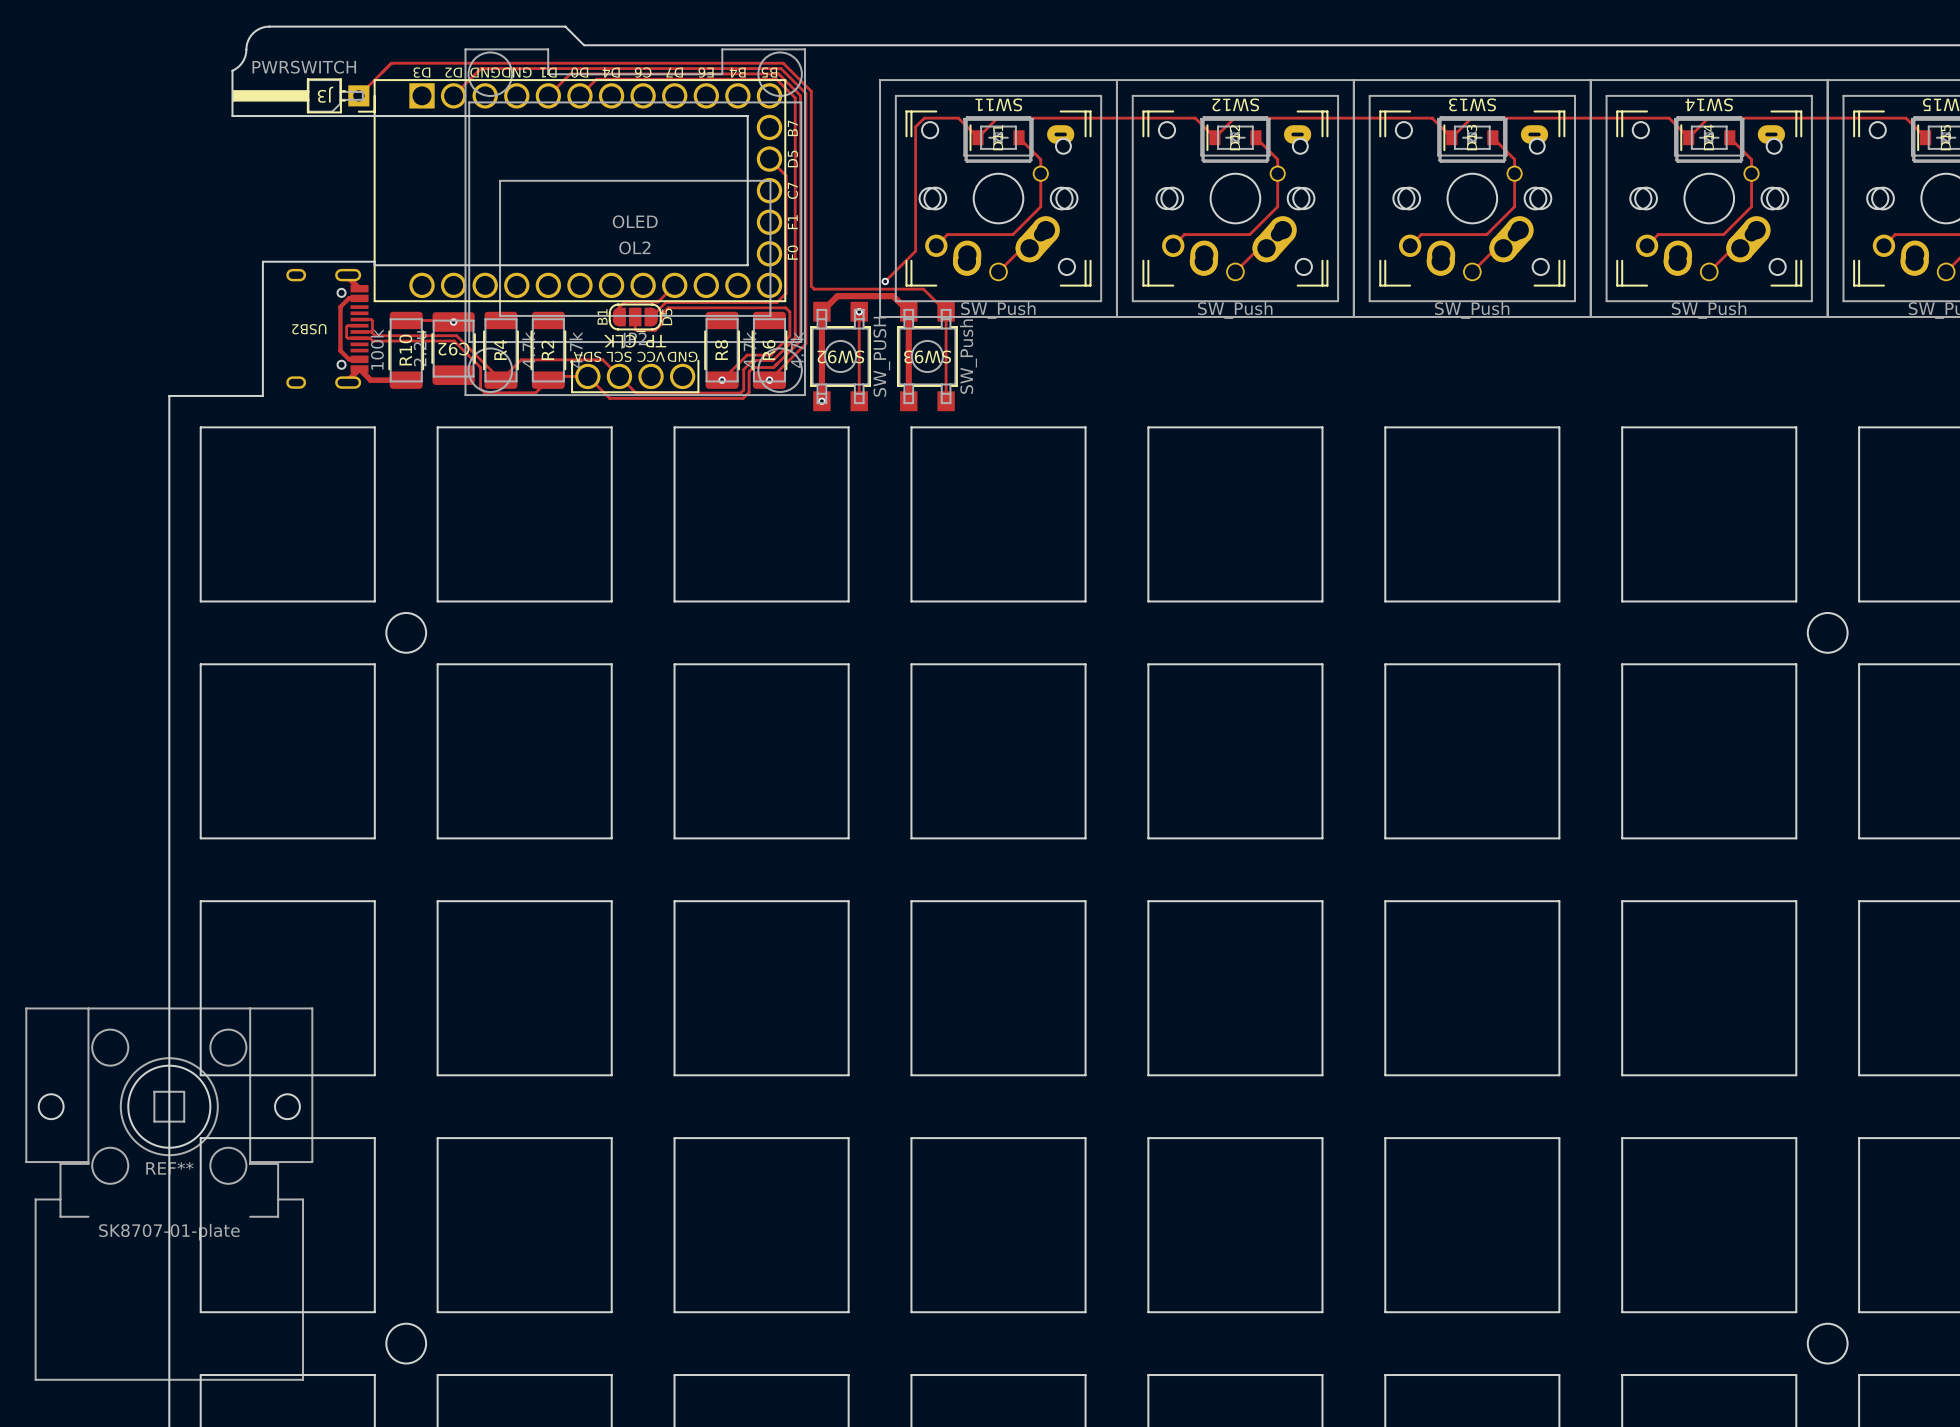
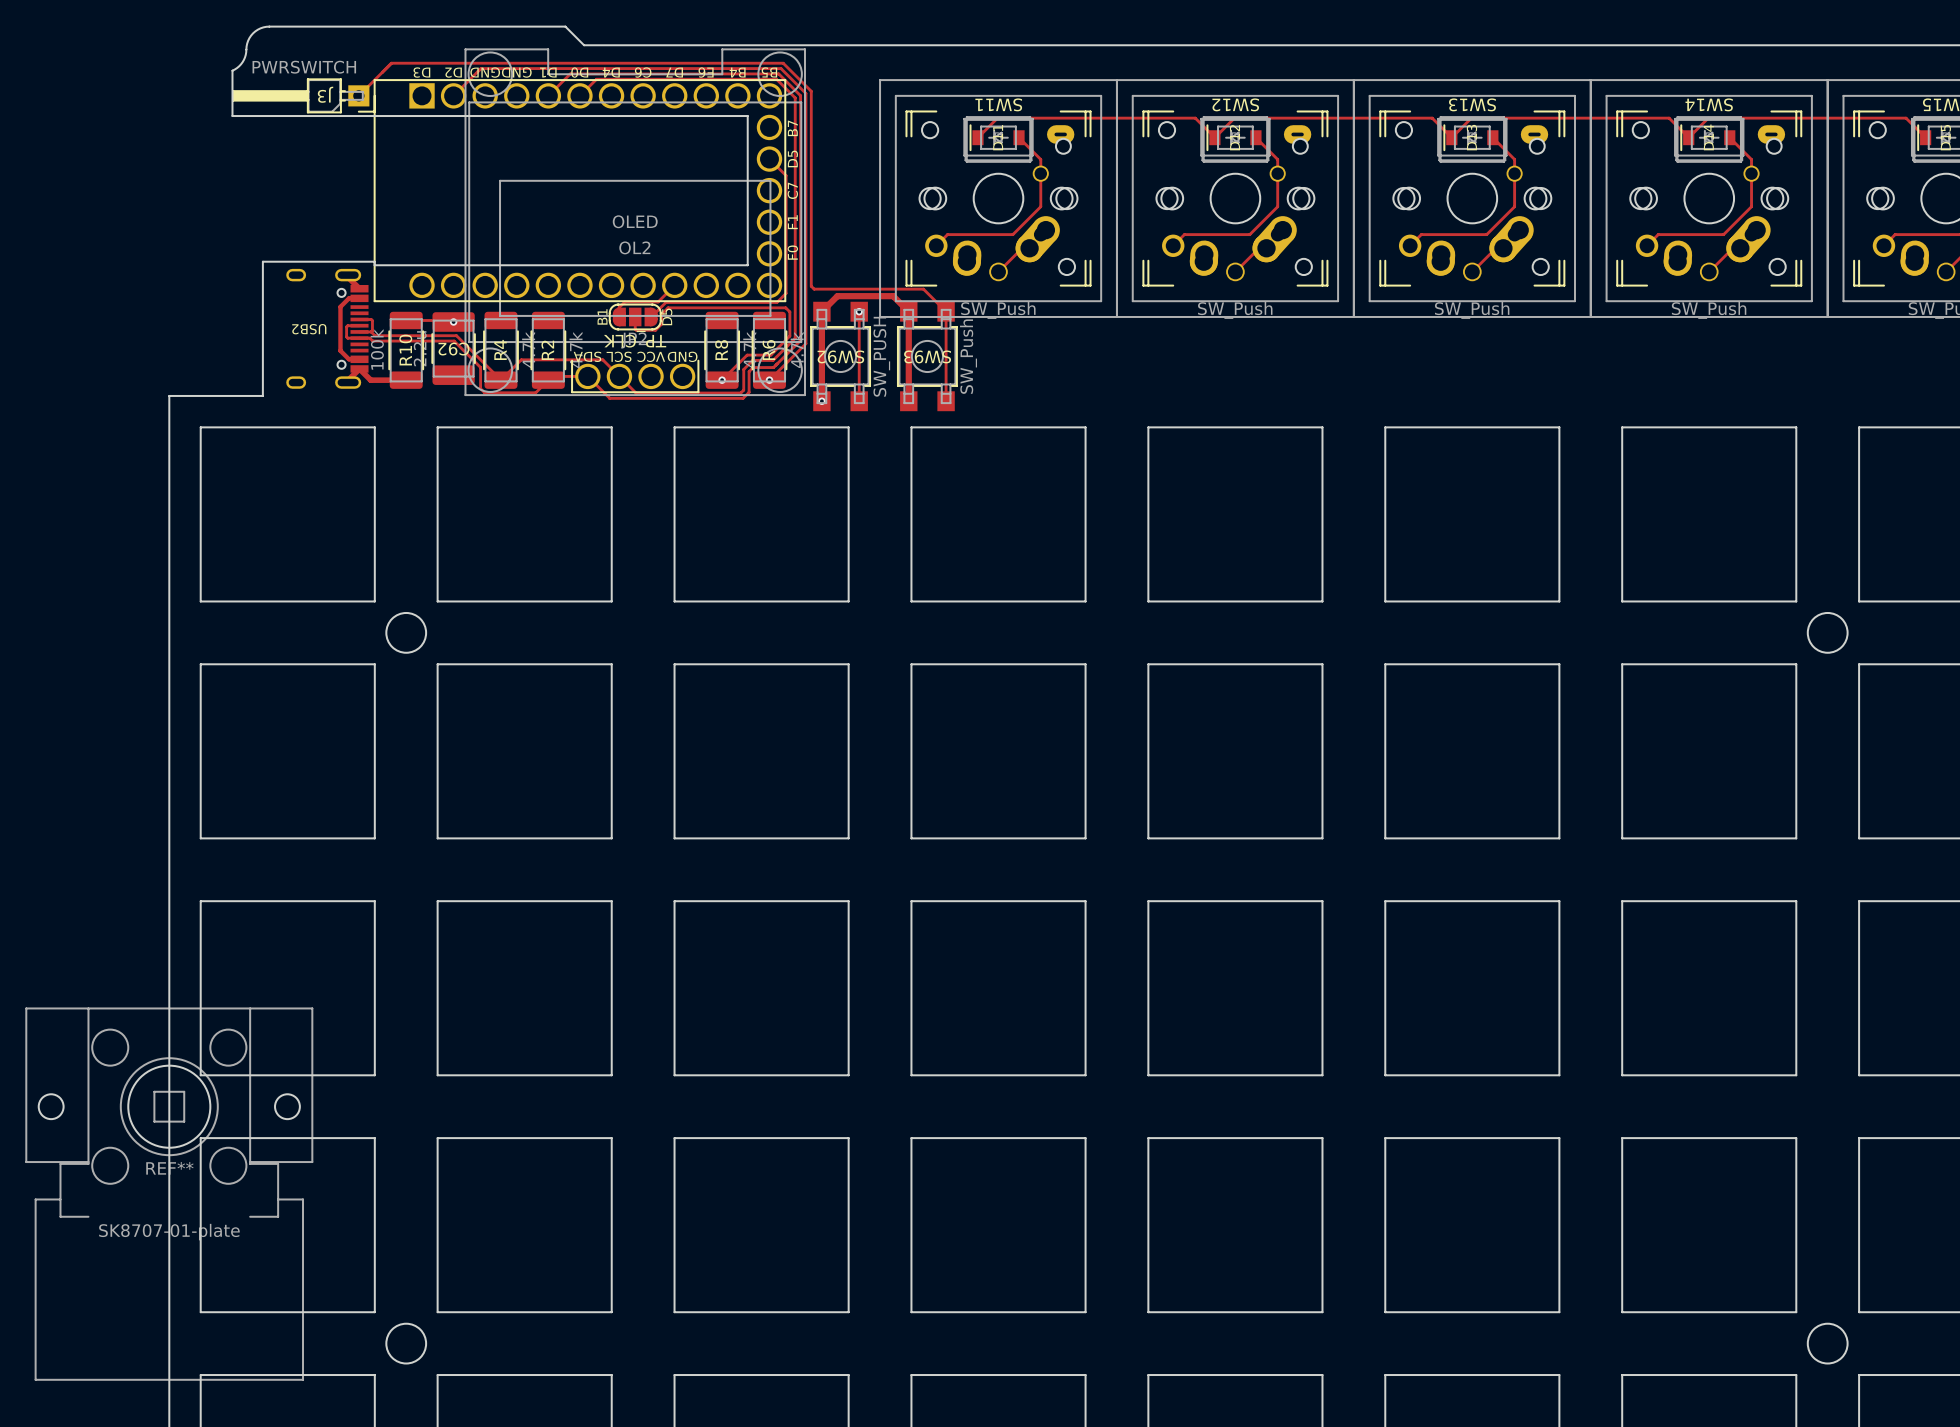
track: (977, 137) (958, 118) (924, 118) (915, 126) (915, 251) (885, 281) -> none
via: (885, 281) -> none

